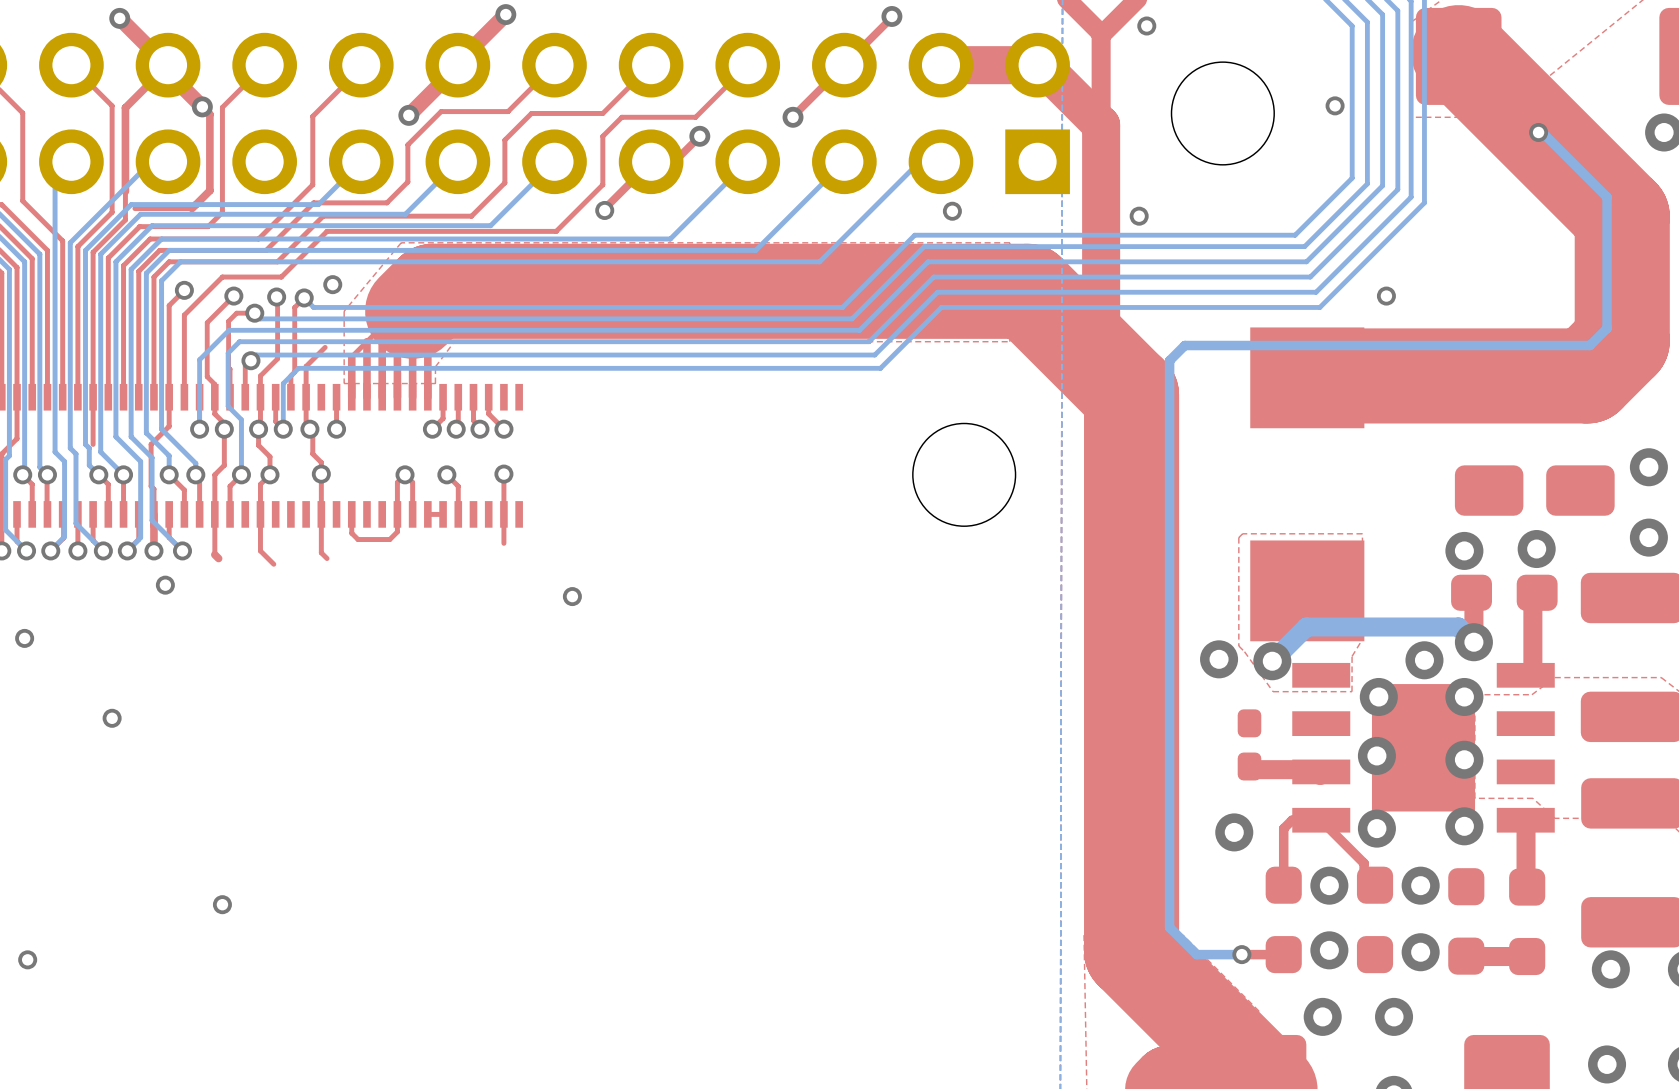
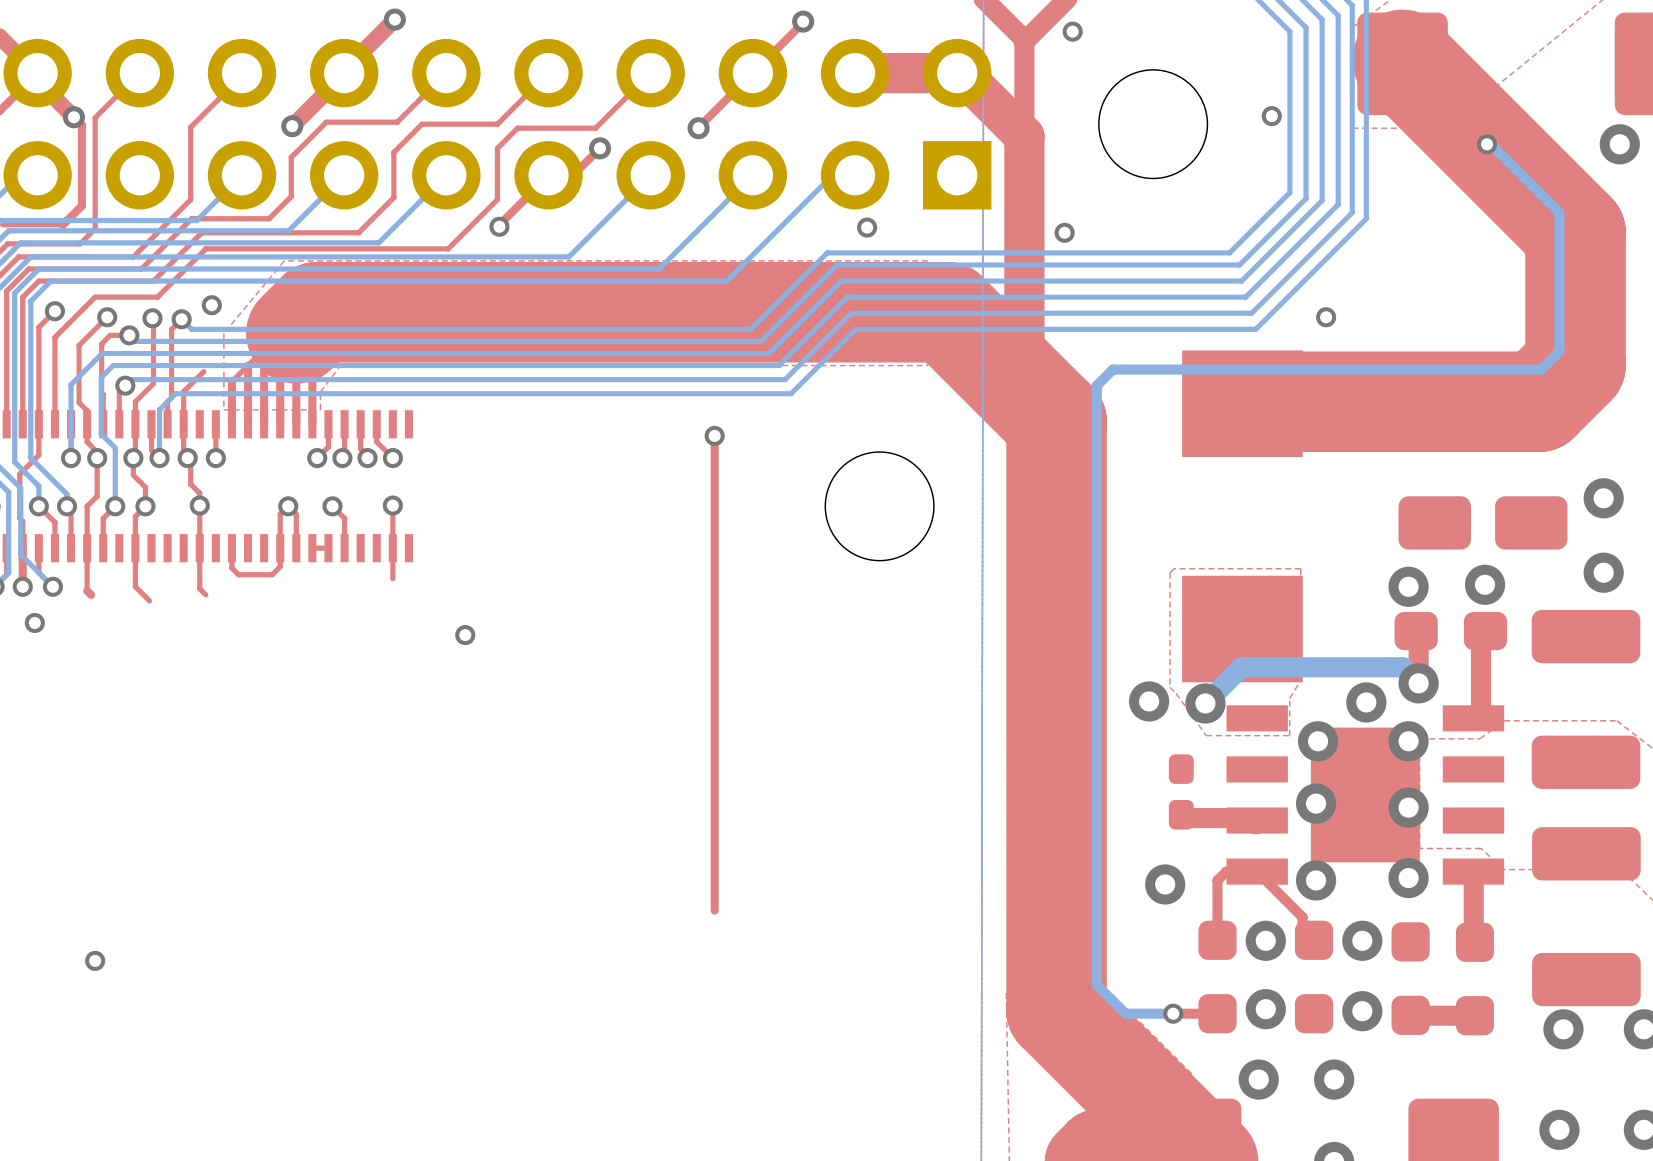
top track: none -> (714, 435) (714, 910)
via: none -> (714, 435)

